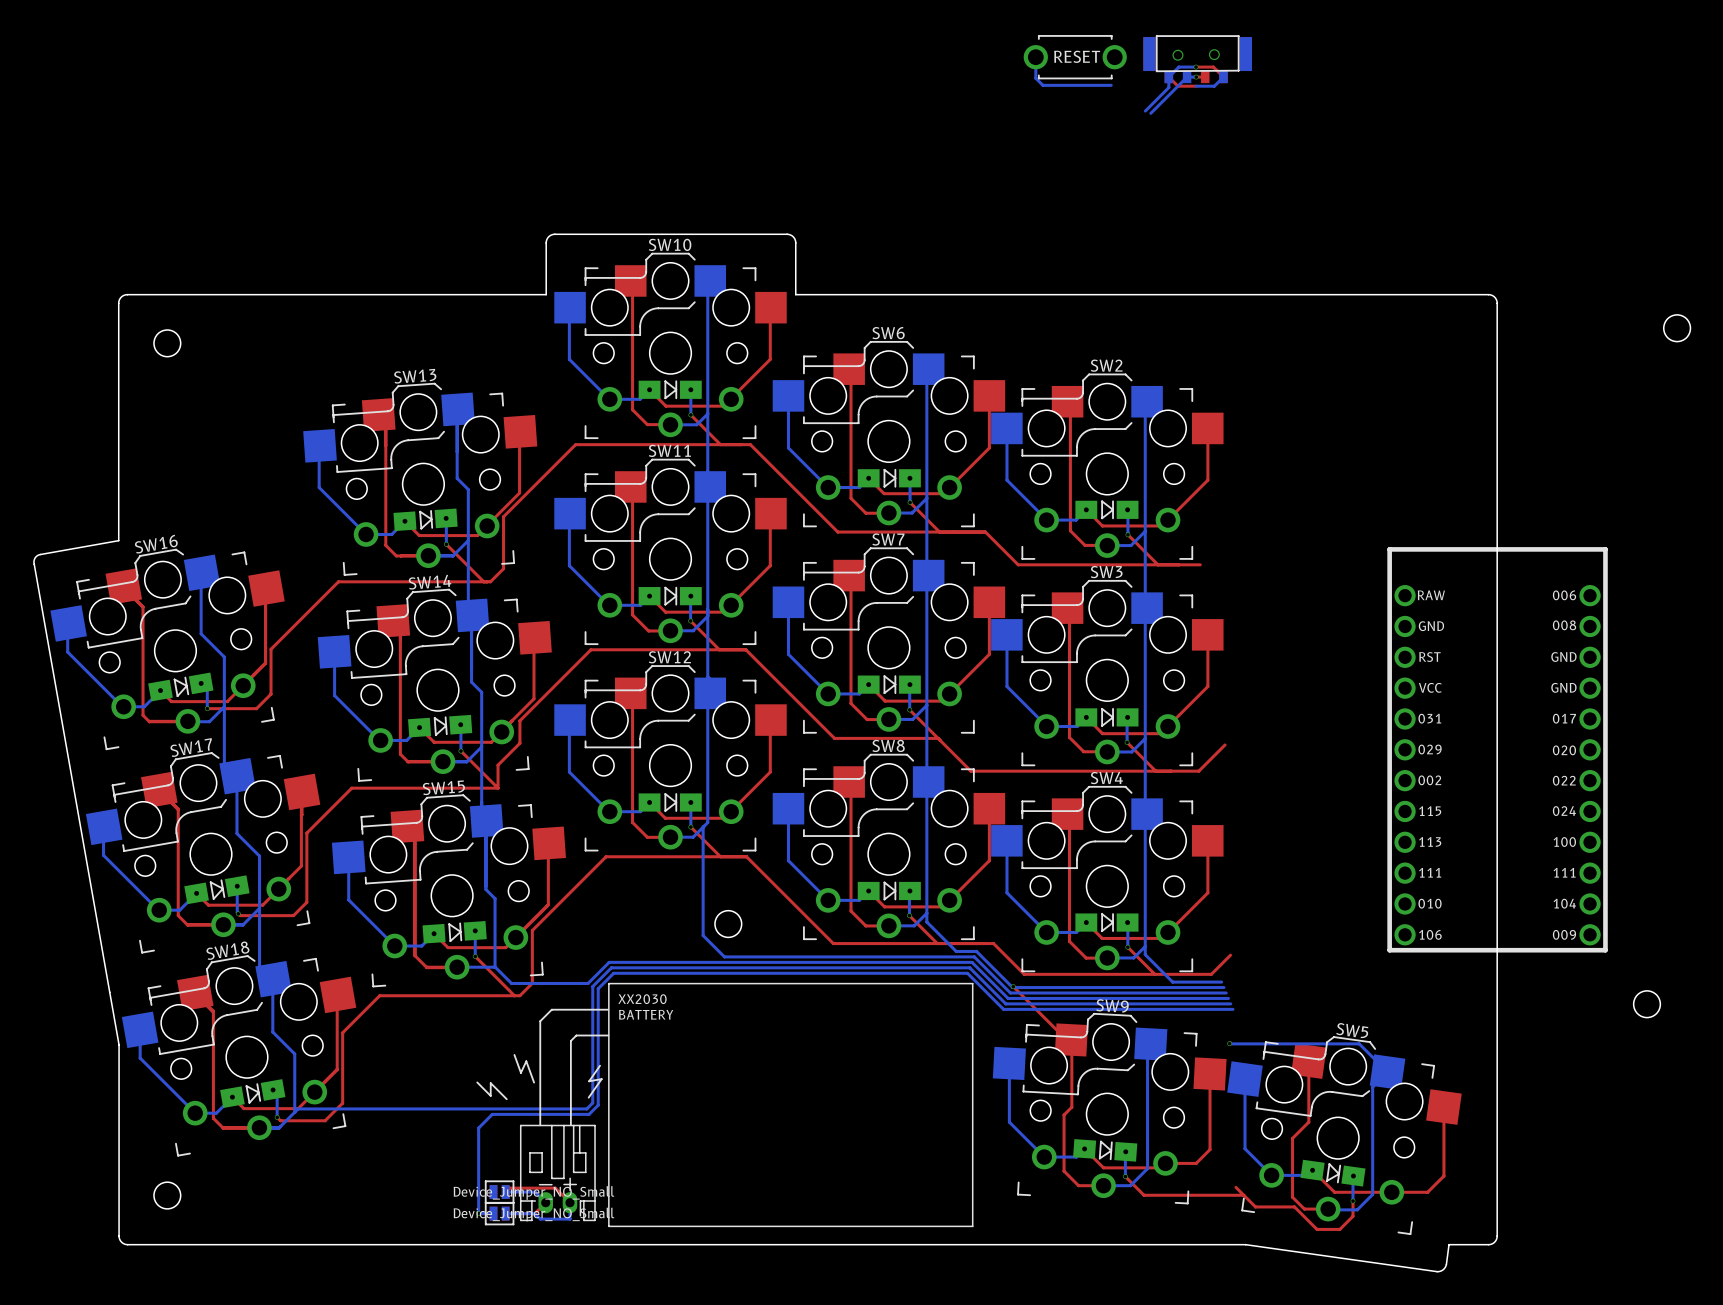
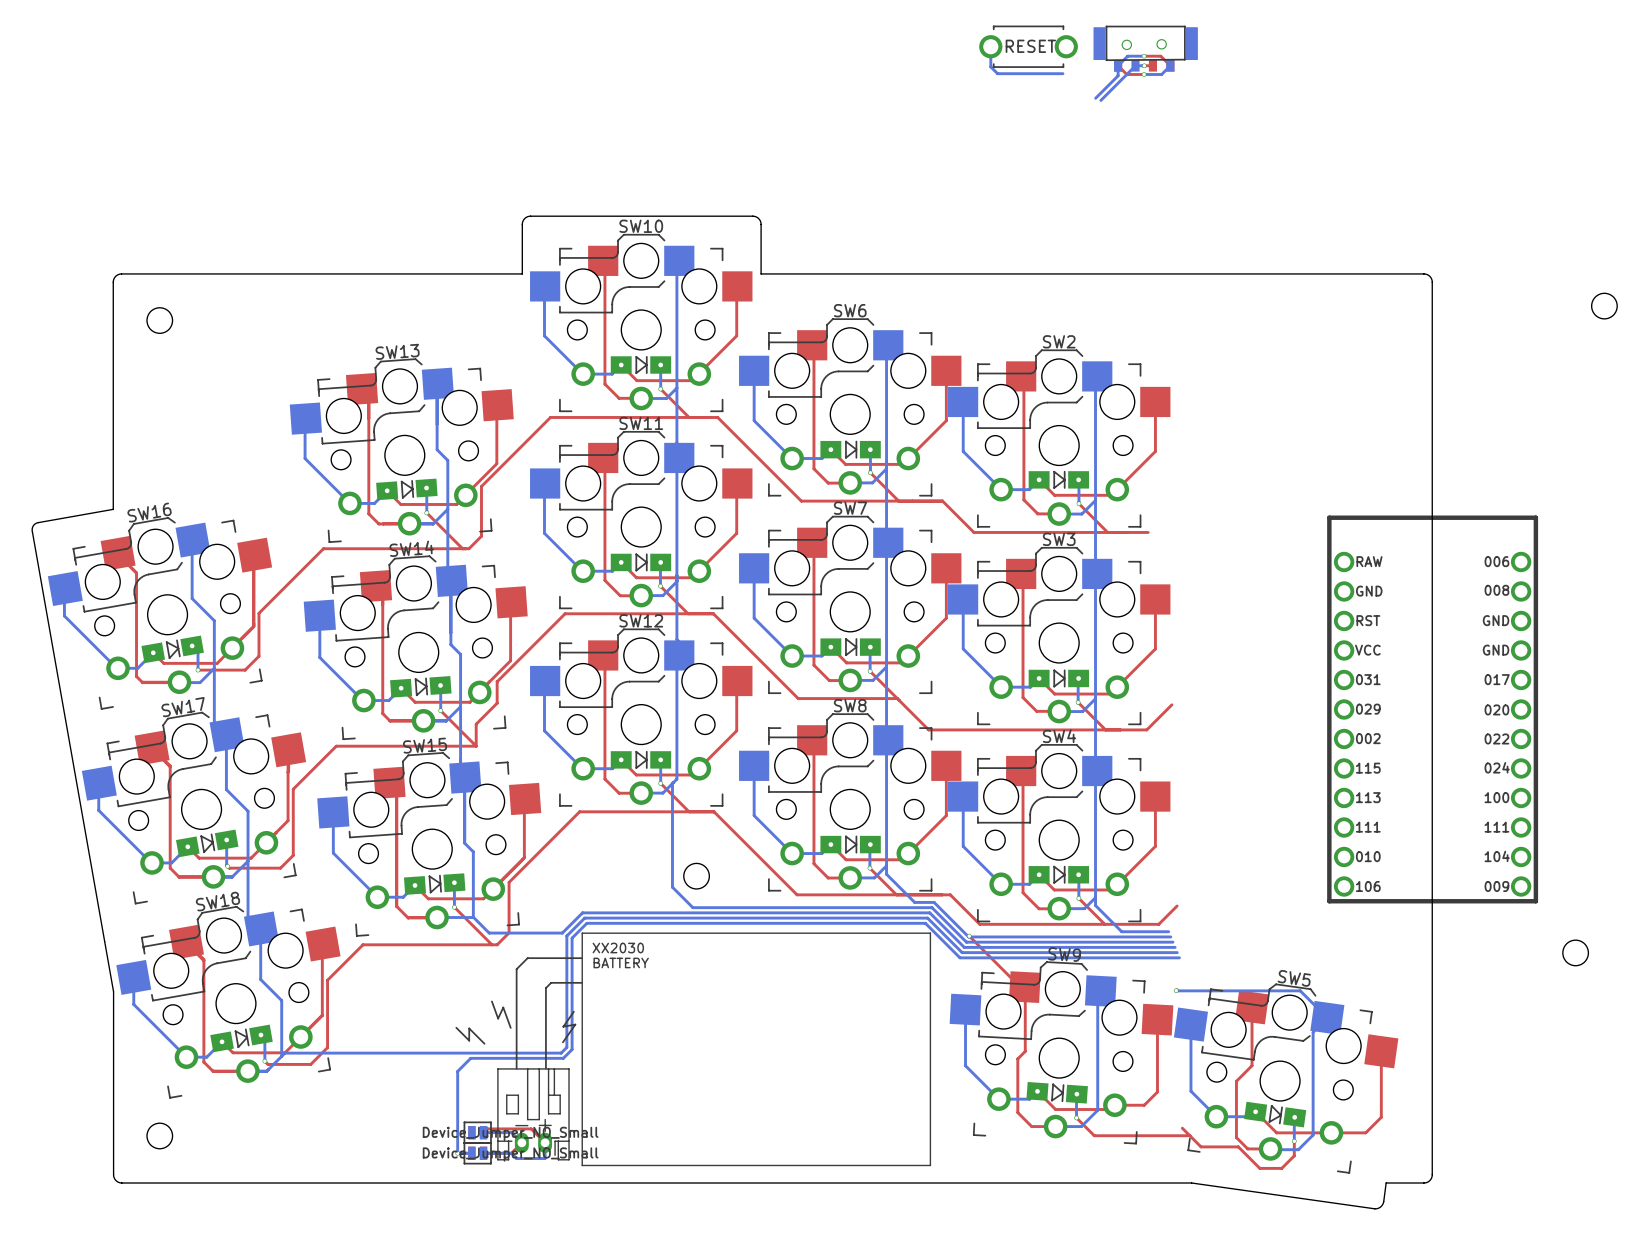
via: none -> (1144, 74)

